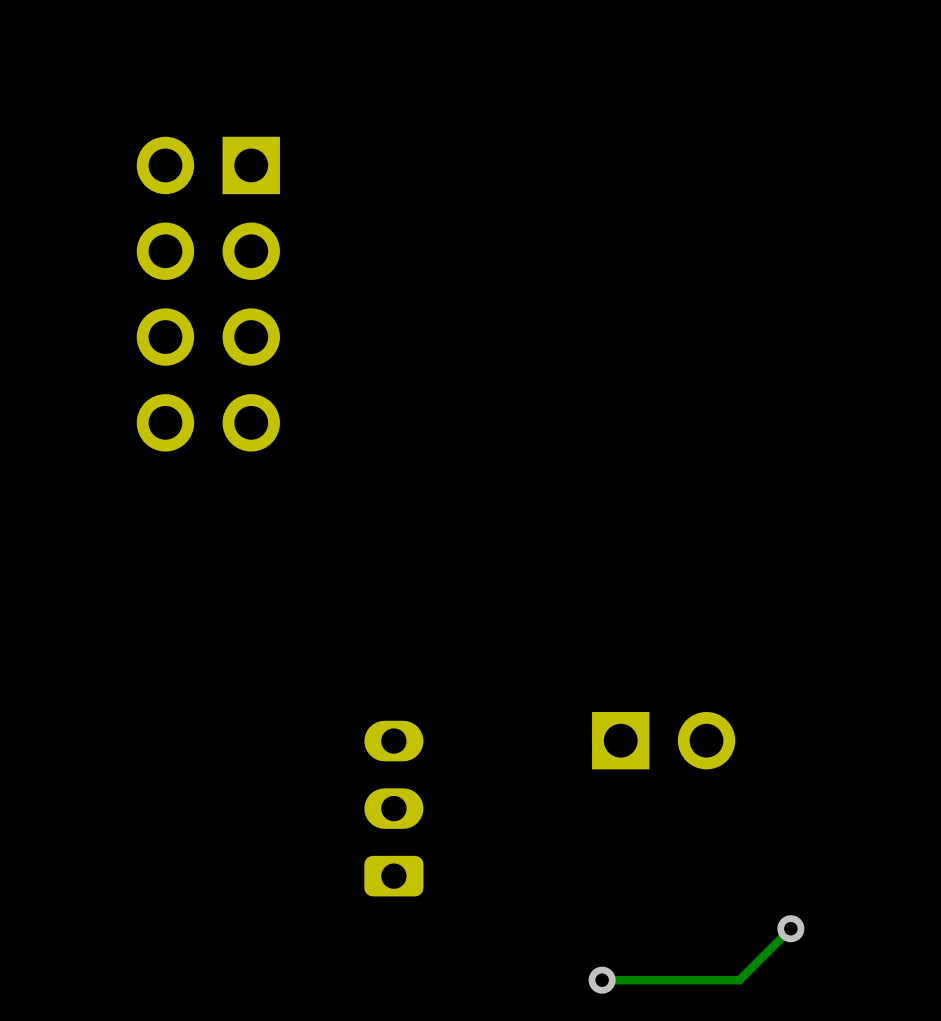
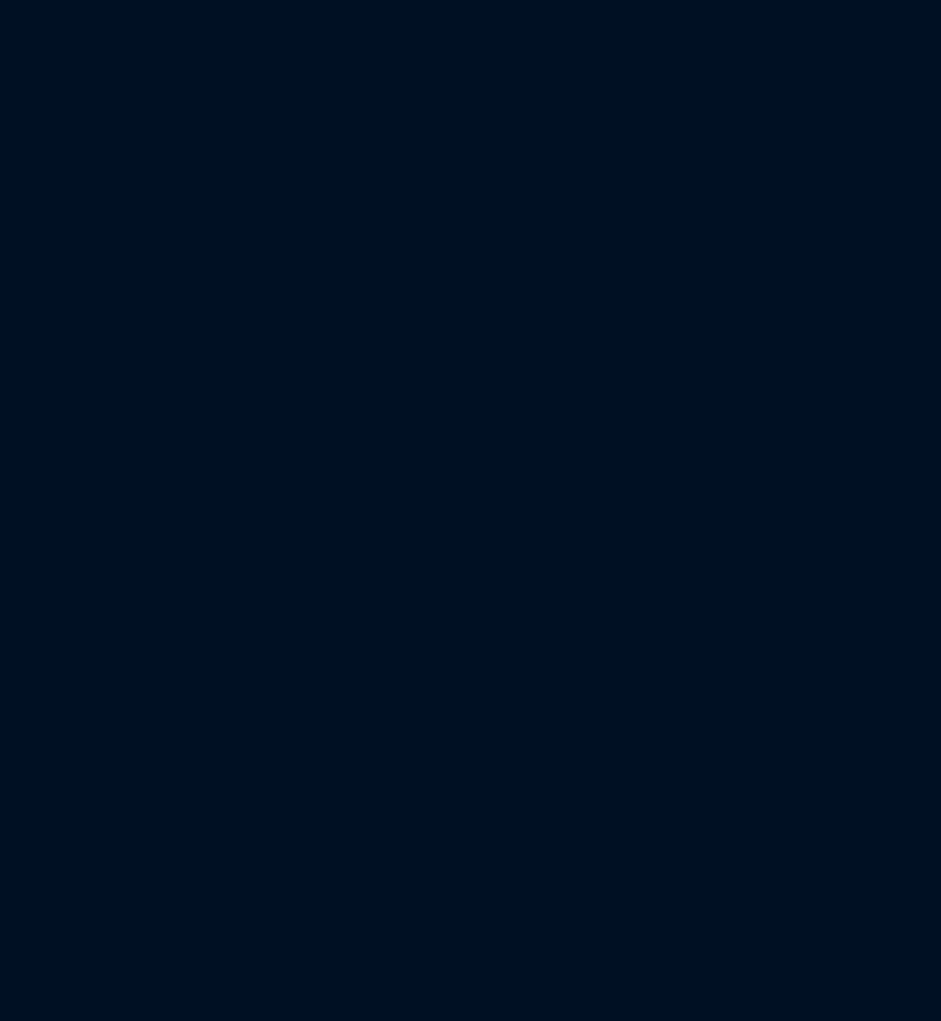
part: (208, 294) -> none
part: (663, 740) -> none
part: (393, 808) -> none
track: (790, 928) (739, 980) (602, 980) -> none
via: (790, 928) -> none
via: (602, 980) -> none

